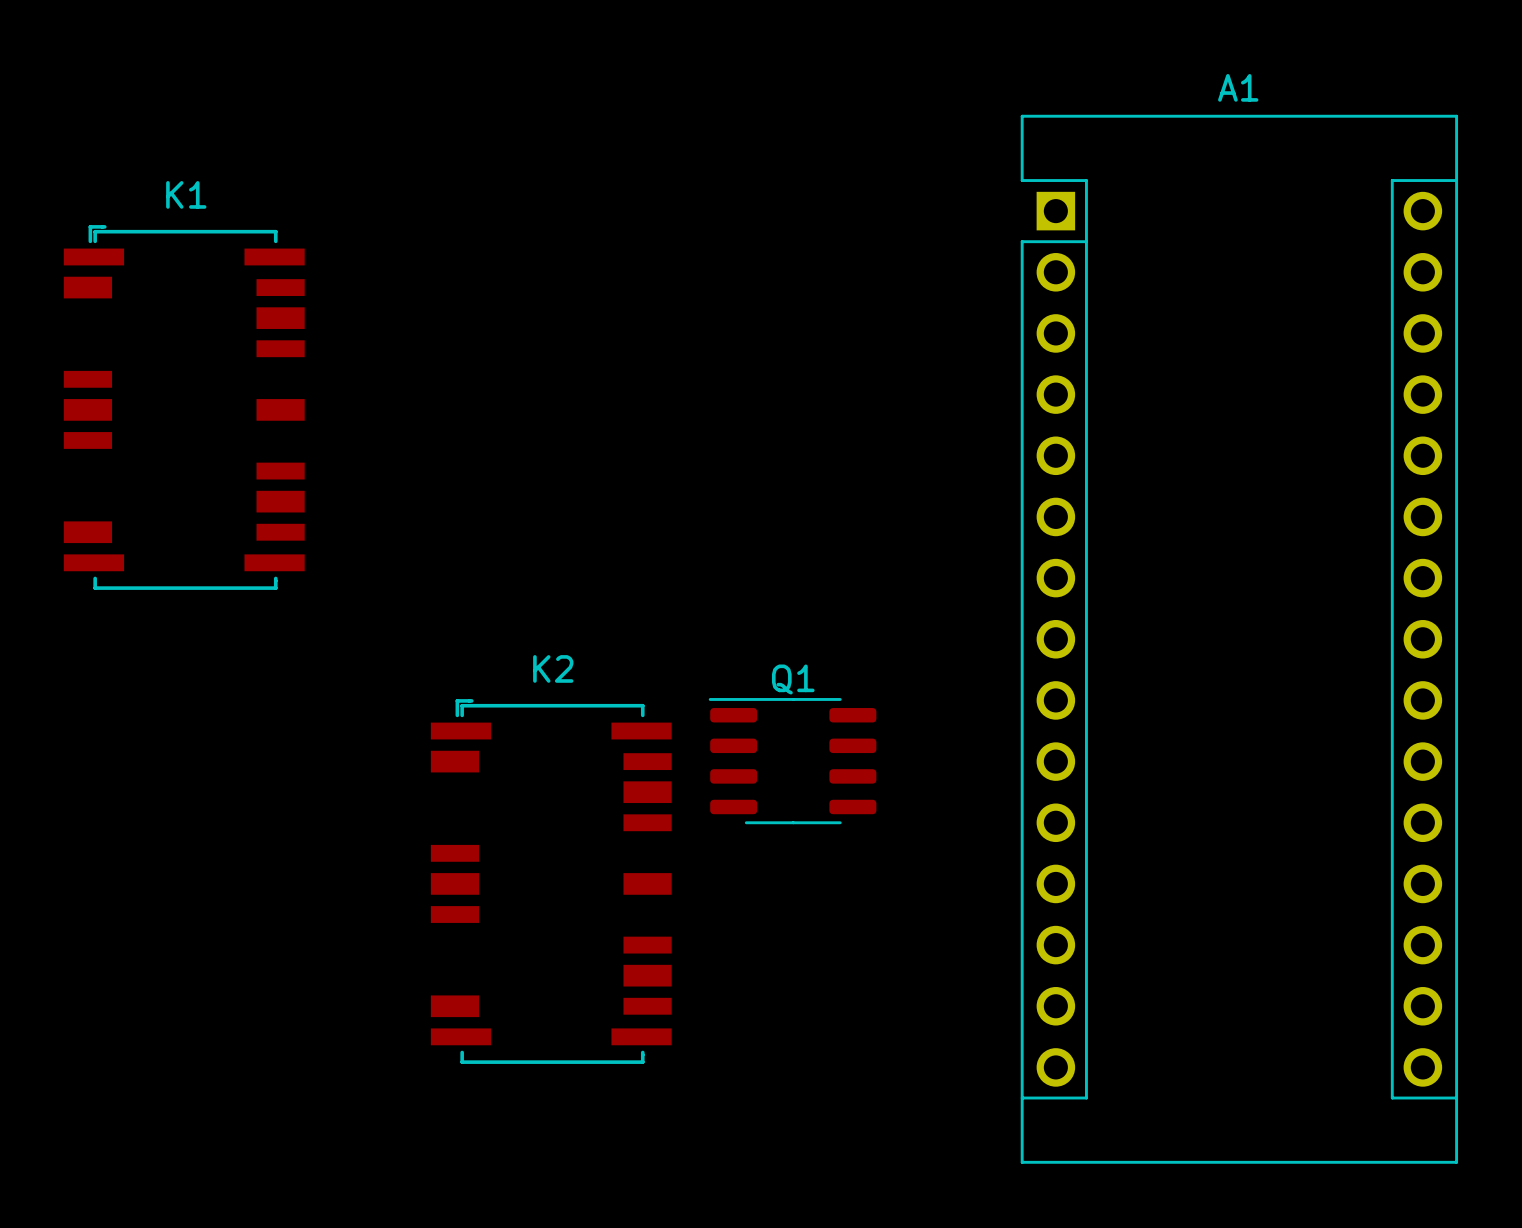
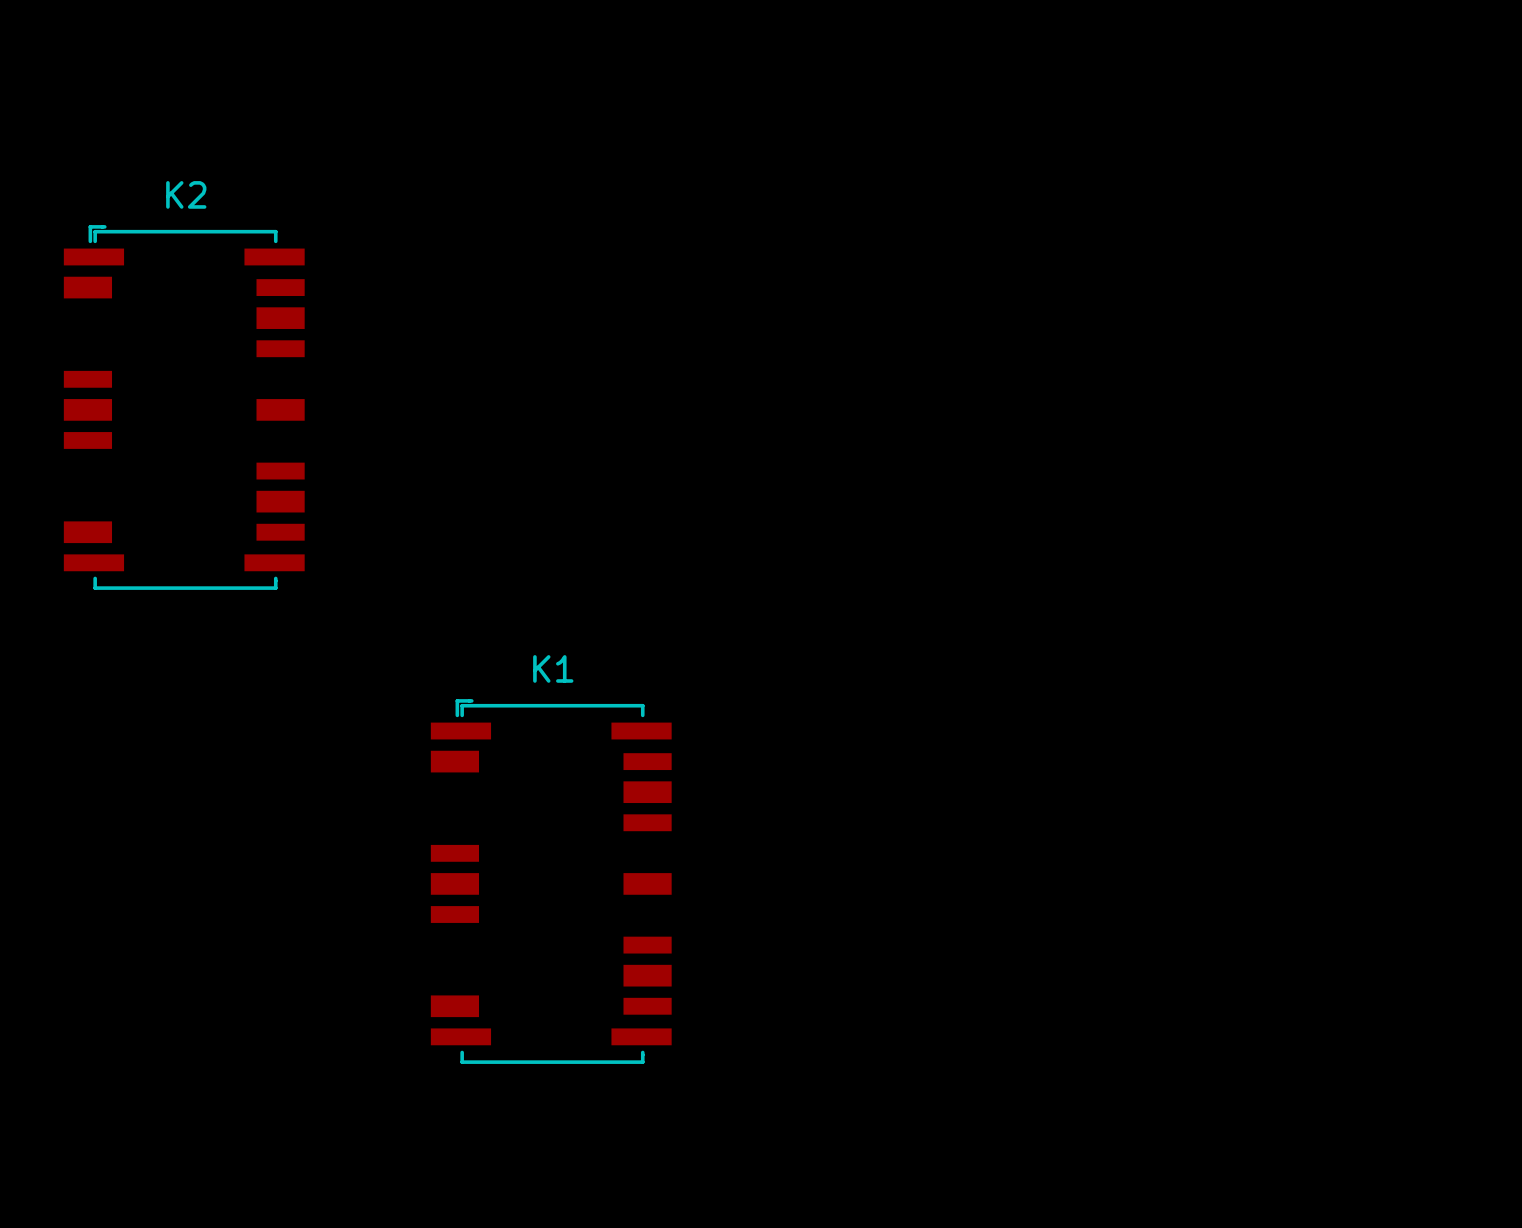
K1 name: K1 (186, 194) -> K2 (186, 194)
A1: (1239, 639) -> none
K2 name: K2 (553, 668) -> K1 (553, 668)
Q1: (792, 761) -> none

